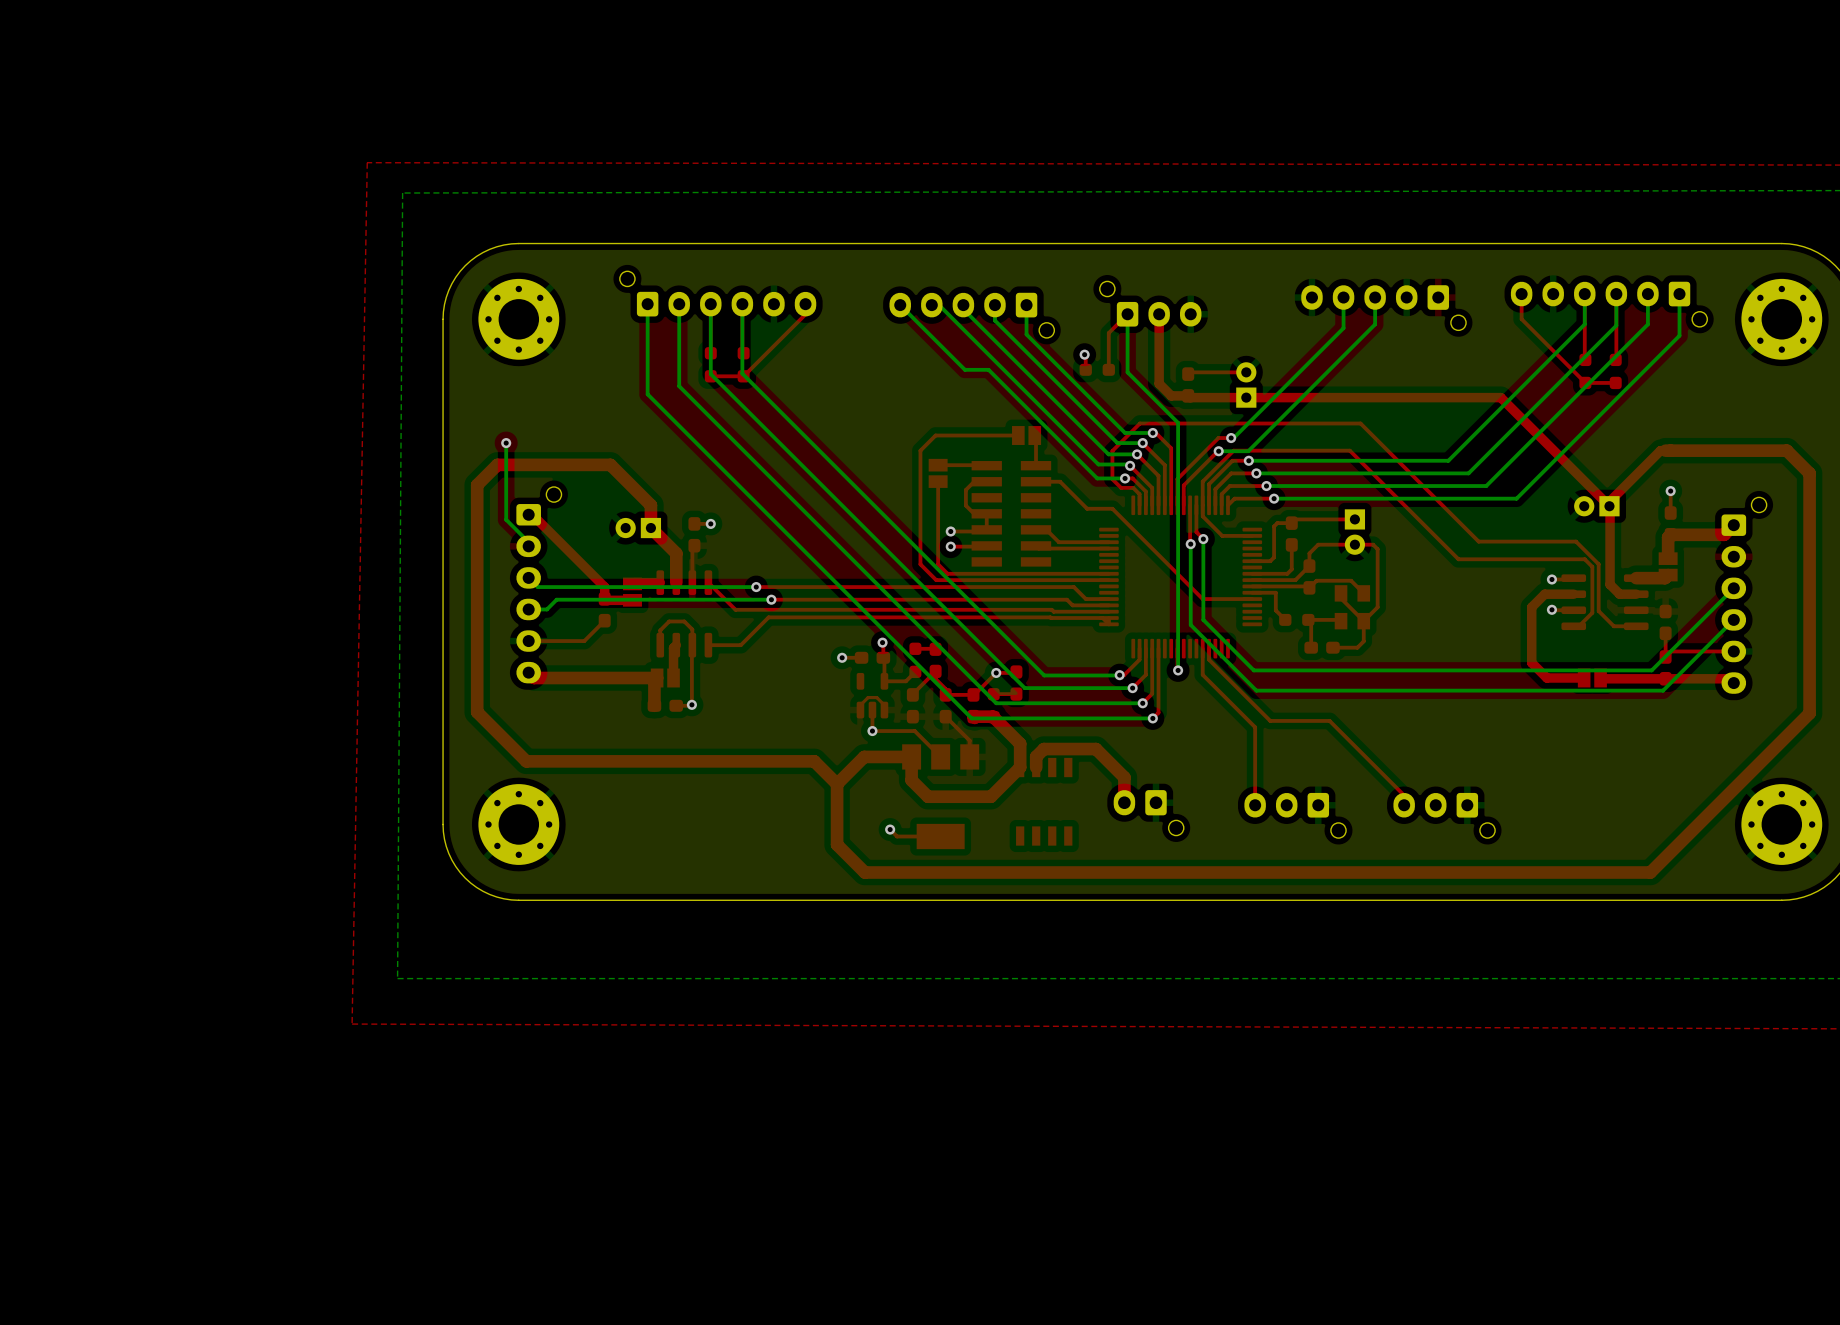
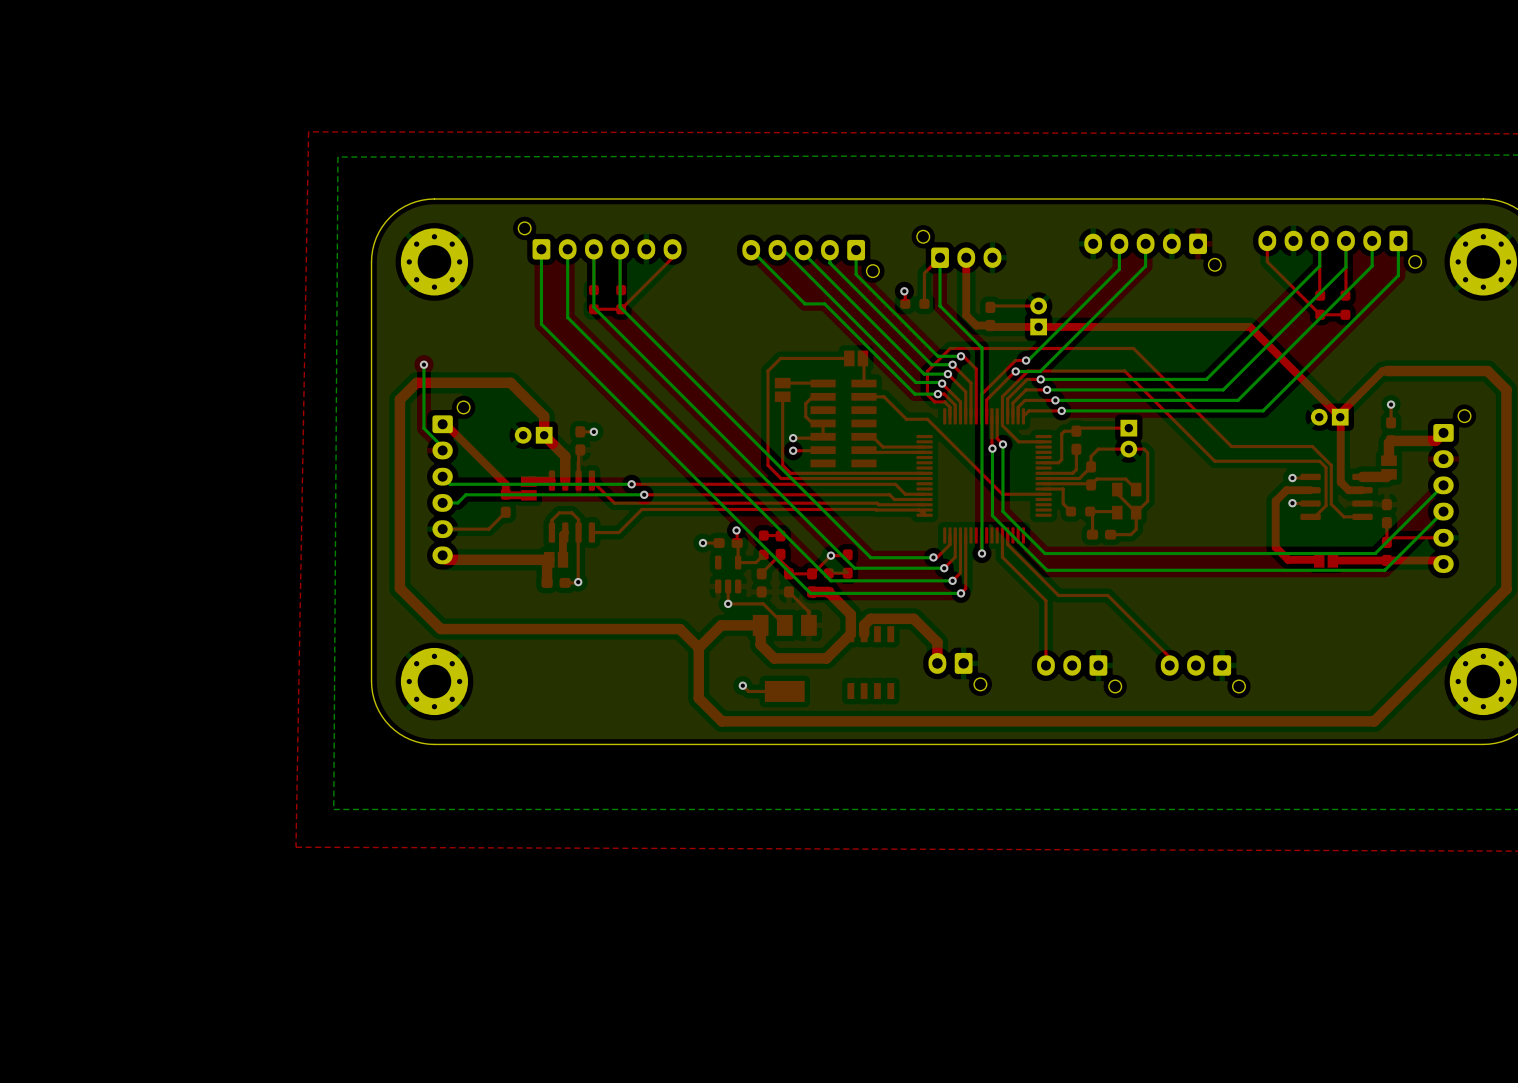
top track: (884, 710) (884, 705) (876, 697) (868, 697) (860, 705) (860, 710) -> none

